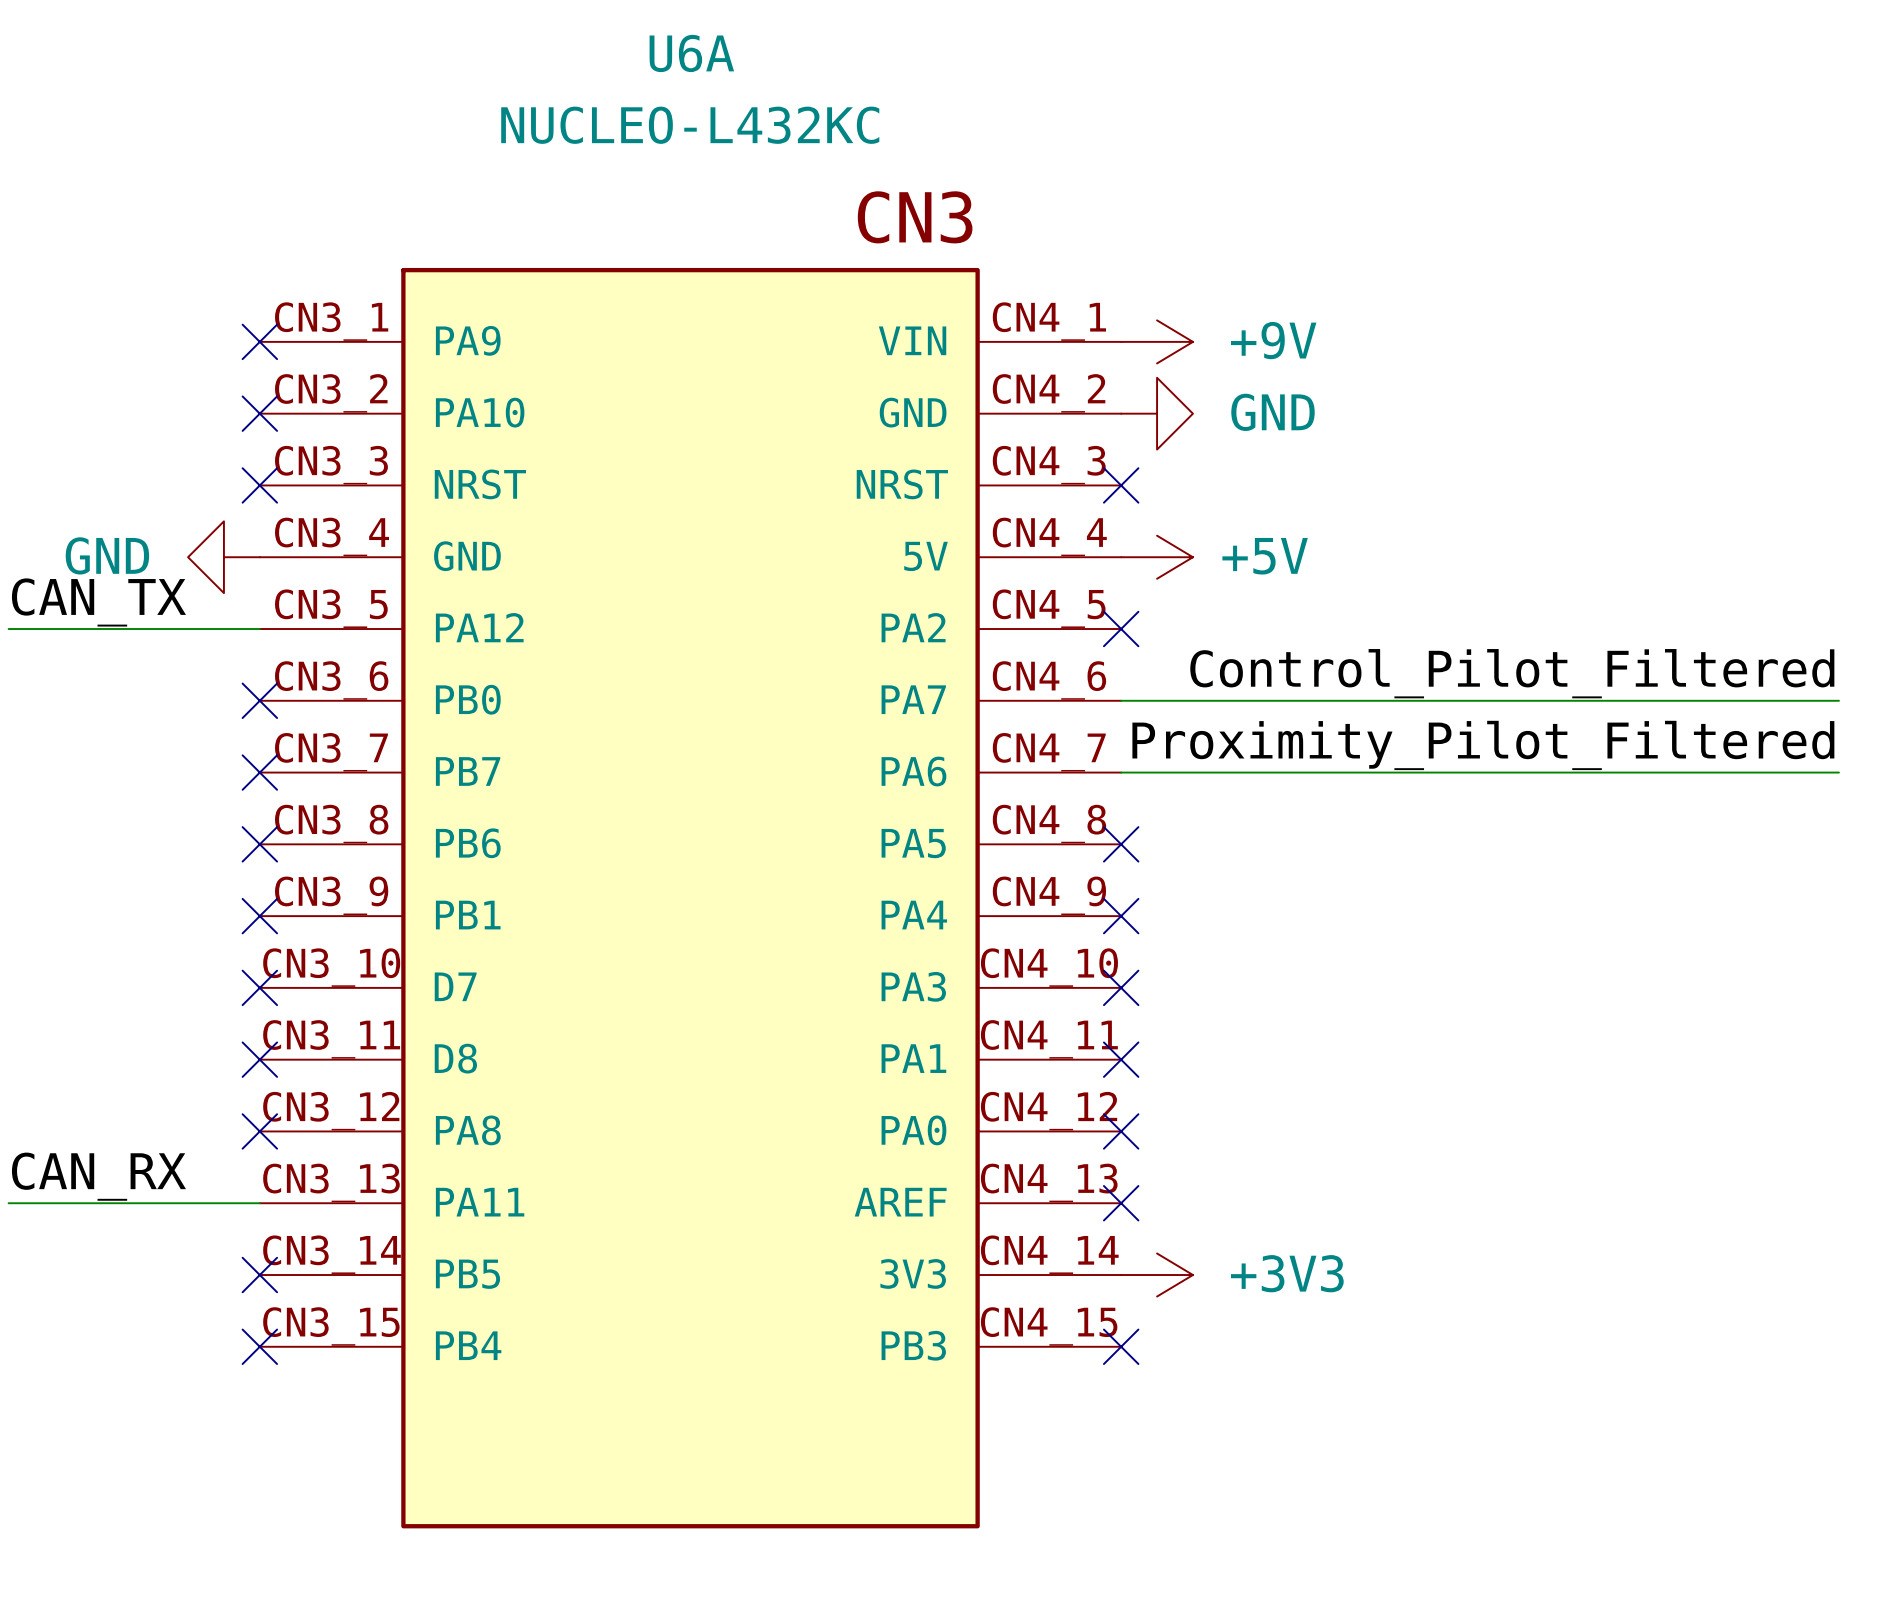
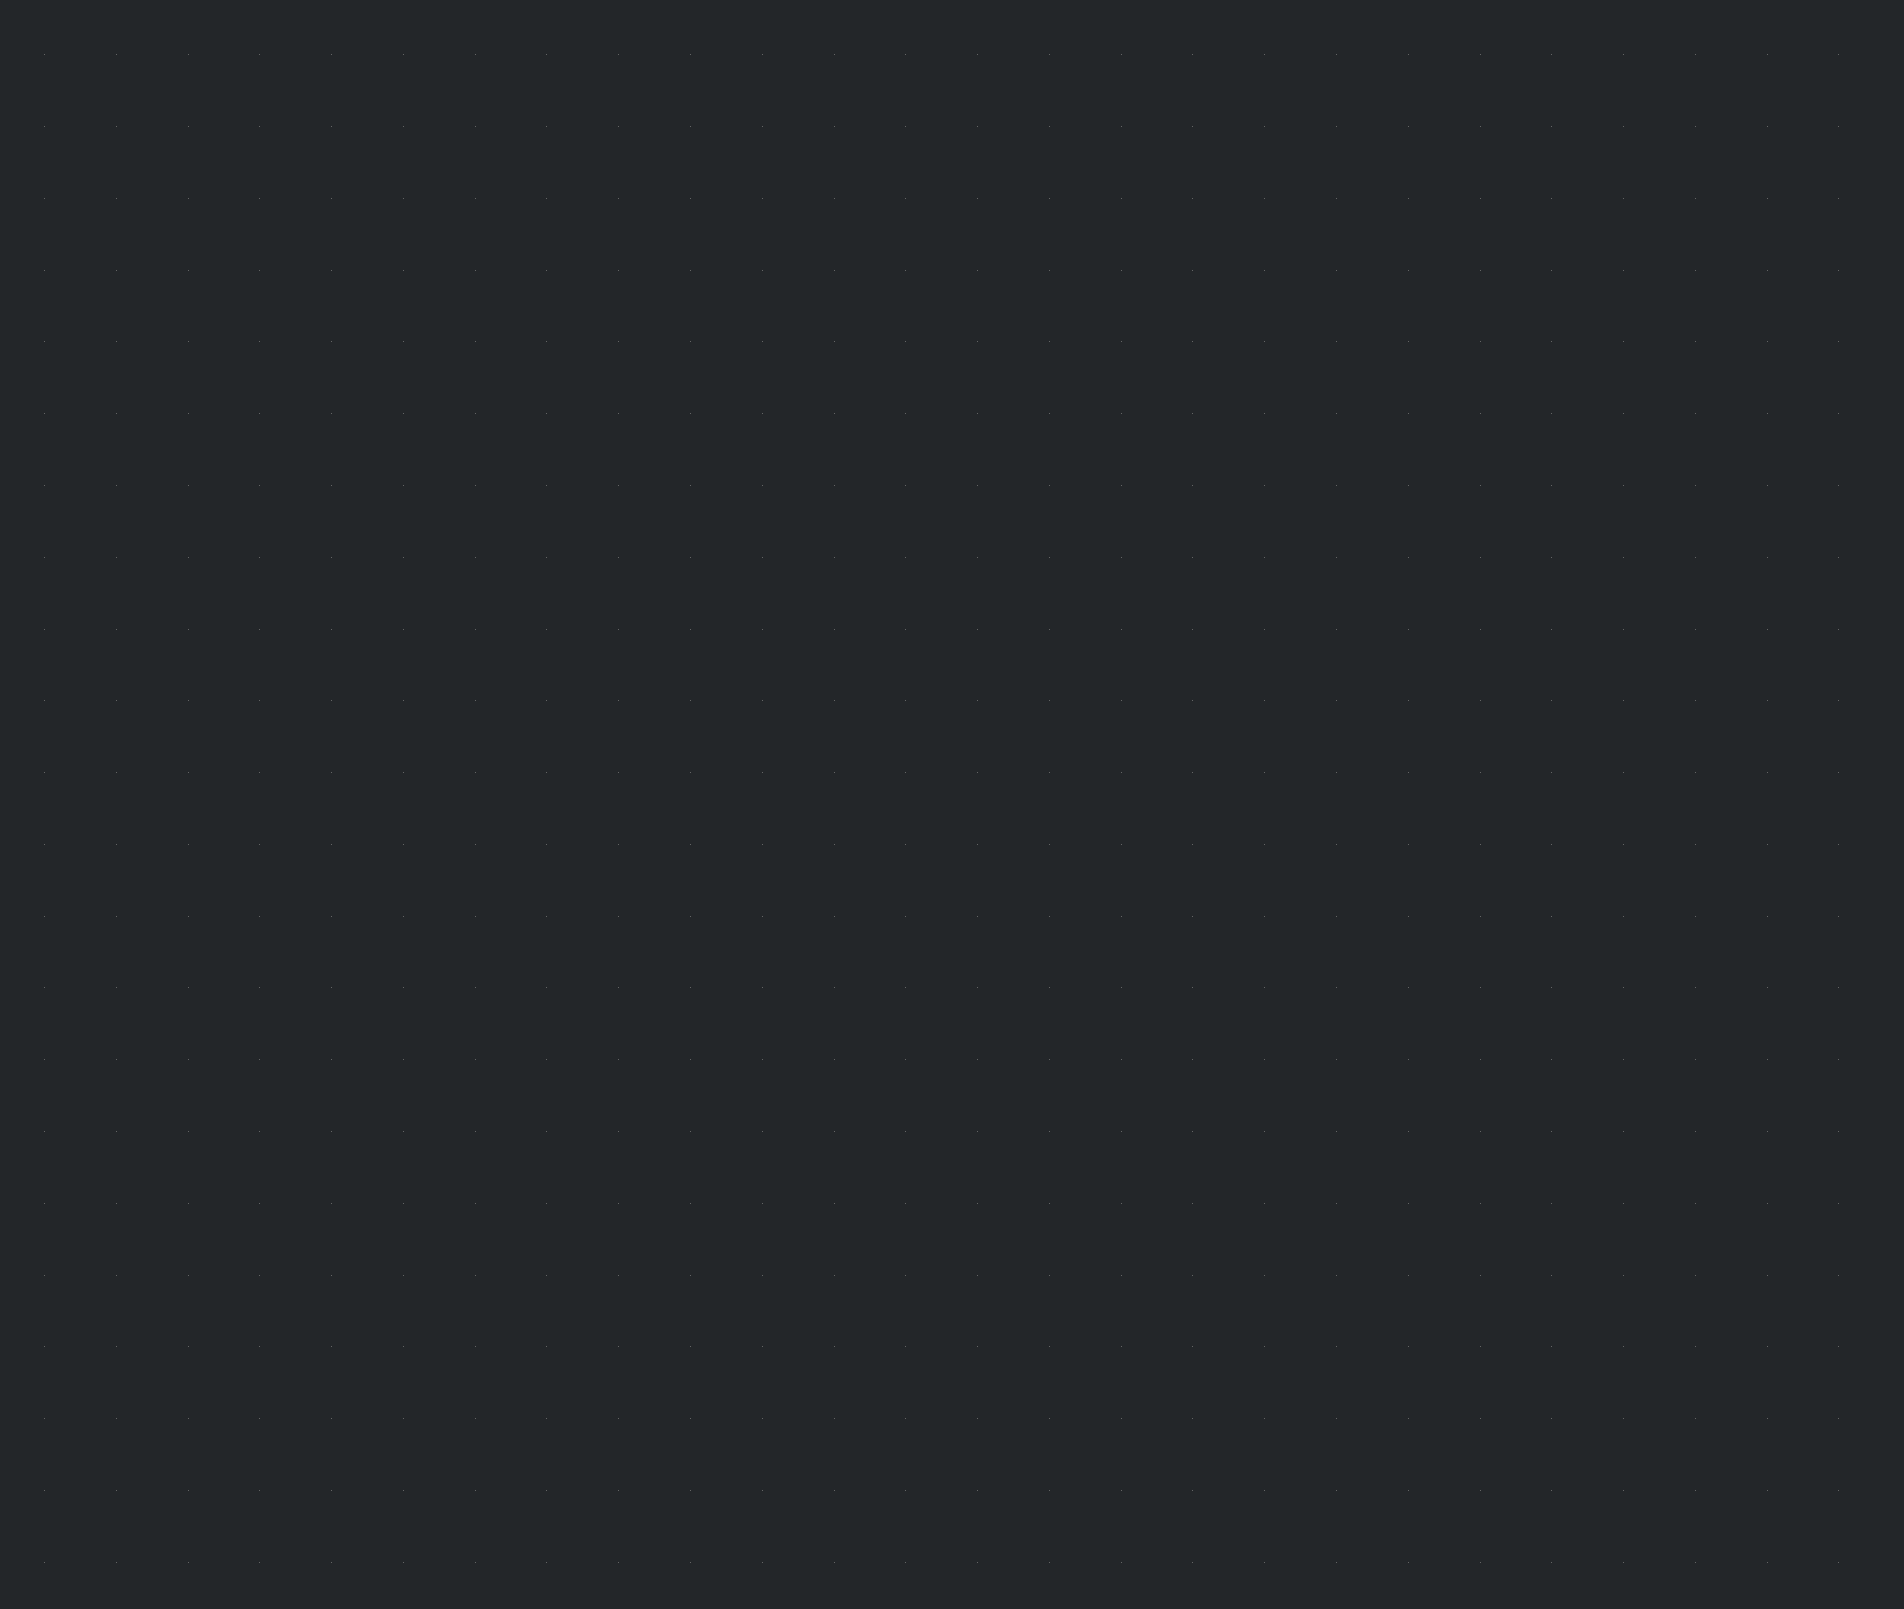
no-connect mark: (259, 341) -> none
power symbol: +9V (1157, 341) -> none
no-connect mark: (259, 413) -> none
power symbol: GND (1157, 413) -> none
no-connect mark: (259, 485) -> none
no-connect mark: (1121, 485) -> none
power symbol: GND (223, 557) -> none
power symbol: +5V (1157, 557) -> none
label: CAN_TX (98, 602) -> none
wire: (8, 629) (259, 629) -> none
no-connect mark: (1121, 629) -> none
label: Control_Pilot_Filtered (1512, 673) -> none
no-connect mark: (259, 700) -> none
wire: (1121, 700) (1838, 700) -> none
label: Proximity_Pilot_Filtered (1483, 745) -> none
no-connect mark: (259, 772) -> none
wire: (1121, 772) (1838, 772) -> none
no-connect mark: (259, 844) -> none
no-connect mark: (1121, 844) -> none
U6A: NUCLEO-L432KC (690, 898) -> none
no-connect mark: (259, 916) -> none
no-connect mark: (1121, 916) -> none
no-connect mark: (259, 987) -> none
no-connect mark: (1121, 987) -> none
no-connect mark: (259, 1059) -> none
no-connect mark: (1121, 1059) -> none
no-connect mark: (259, 1131) -> none
no-connect mark: (1121, 1131) -> none
label: CAN_RX (98, 1176) -> none
wire: (8, 1203) (259, 1203) -> none
no-connect mark: (1121, 1203) -> none
no-connect mark: (259, 1275) -> none
power symbol: +3V3 (1157, 1275) -> none
no-connect mark: (259, 1346) -> none
no-connect mark: (1121, 1346) -> none

